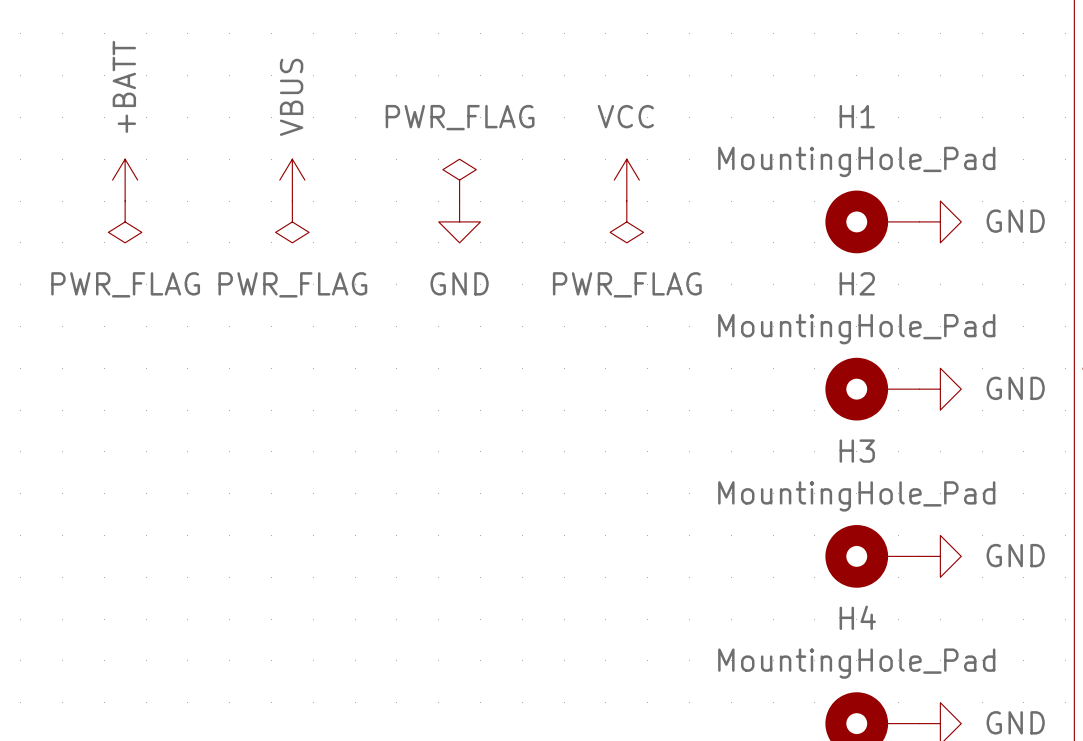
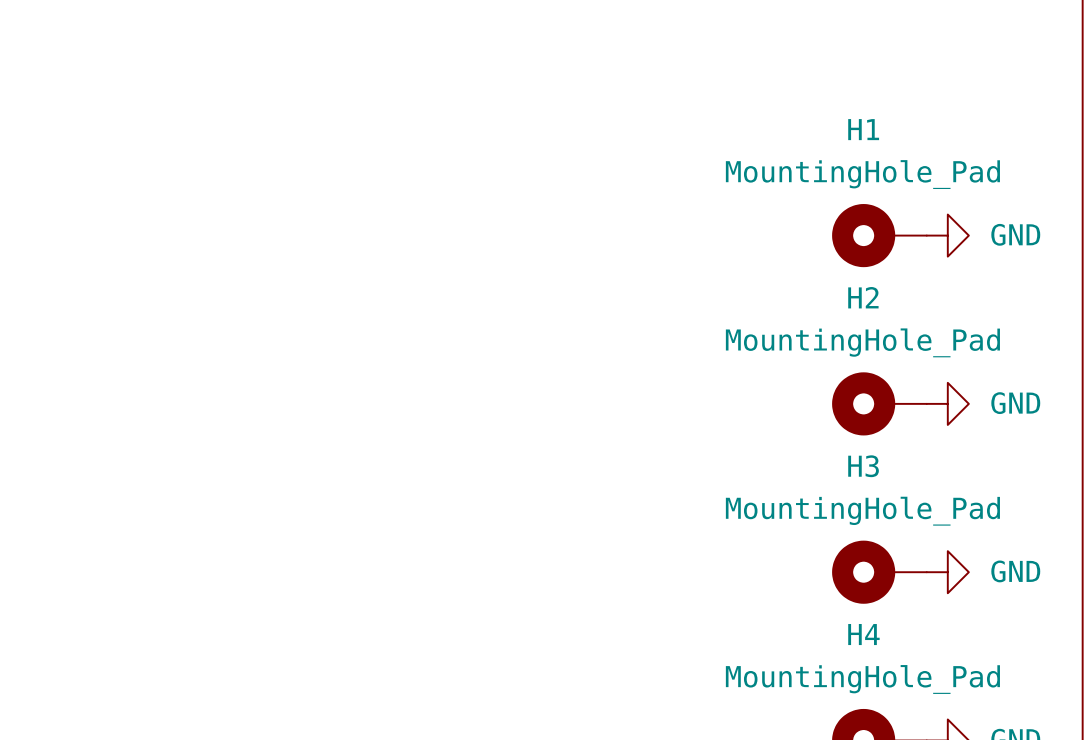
power symbol: +BATT (125, 180) -> none
power symbol: VBUS (292, 180) -> none
power symbol: PWR_FLAG (459, 180) -> none
power symbol: VCC (626, 180) -> none
power symbol: PWR_FLAG (125, 221) -> none
power symbol: PWR_FLAG (292, 221) -> none
power symbol: GND (459, 221) -> none
power symbol: PWR_FLAG (626, 221) -> none

